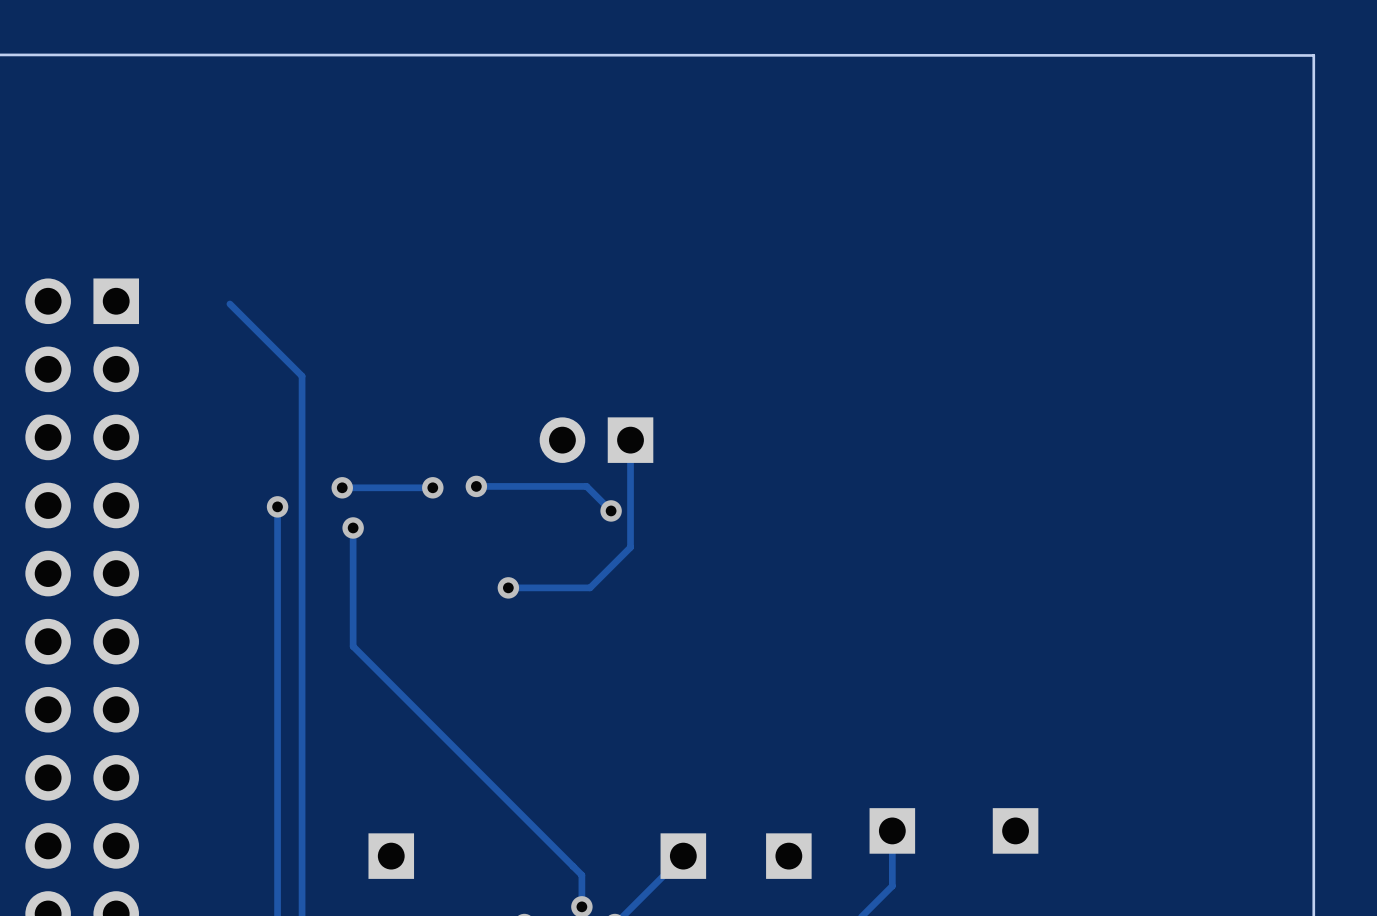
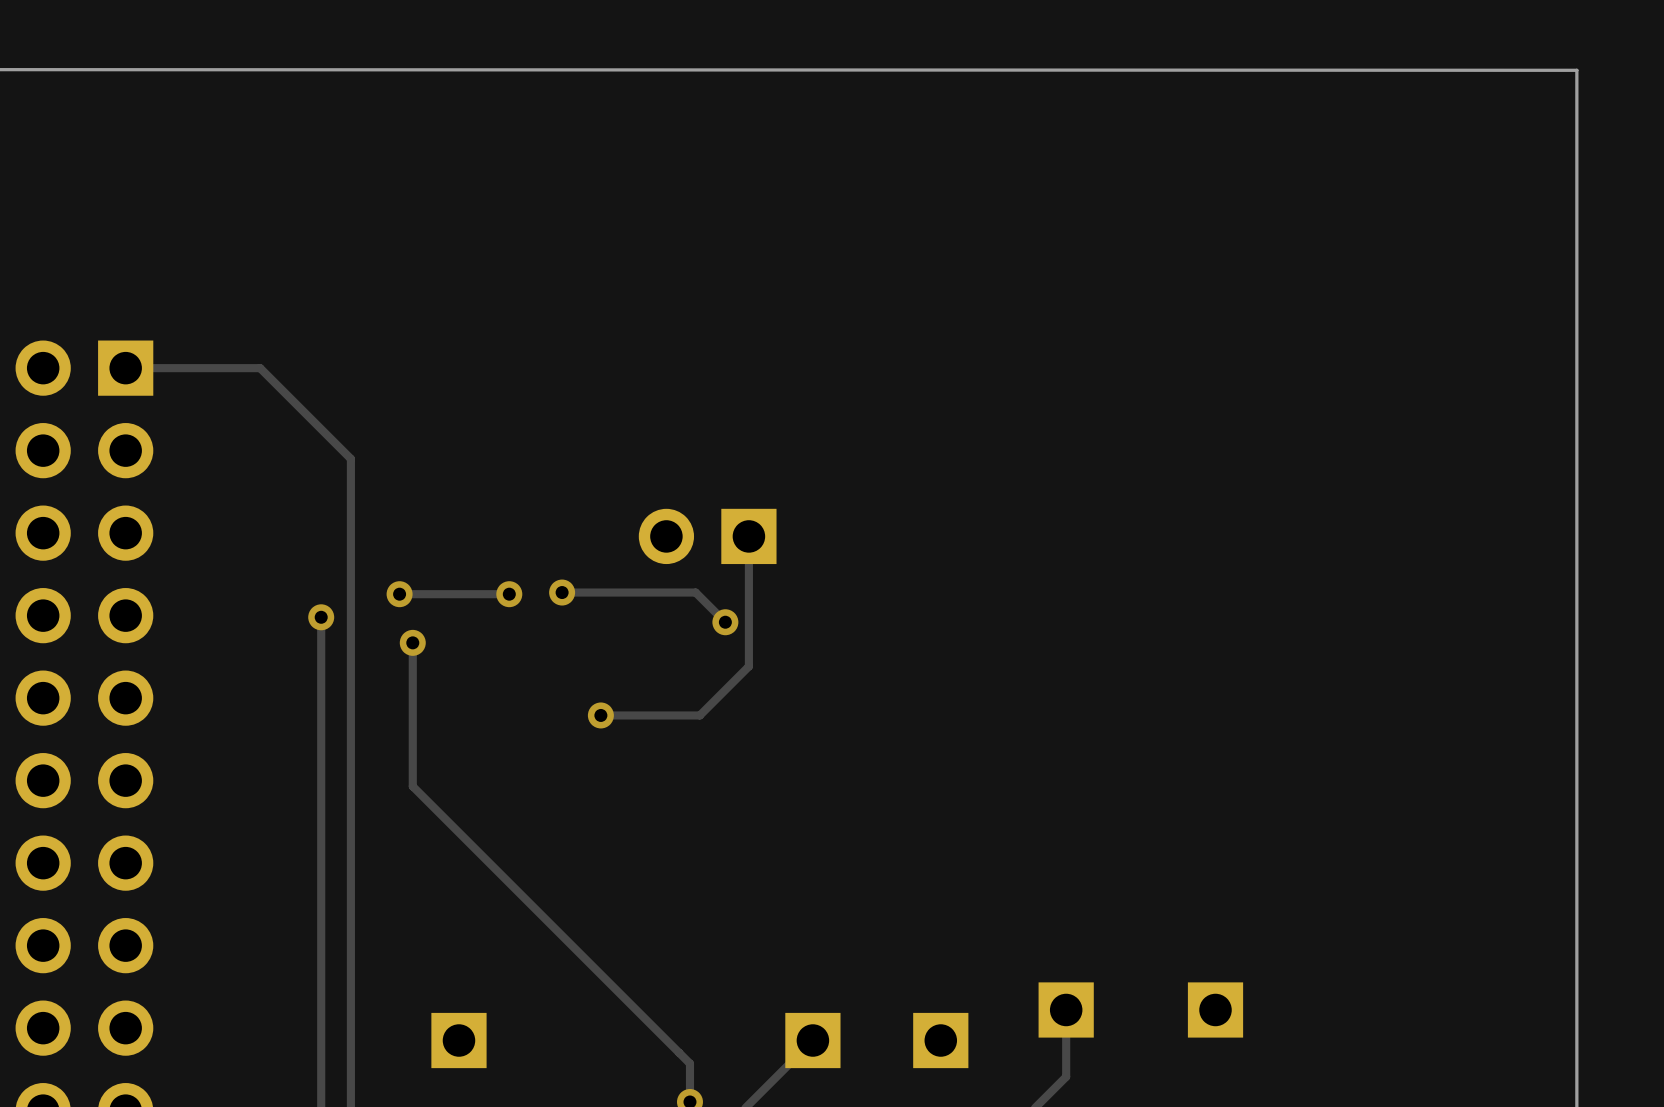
track: none -> (125, 368) (260, 368) (263, 371)

